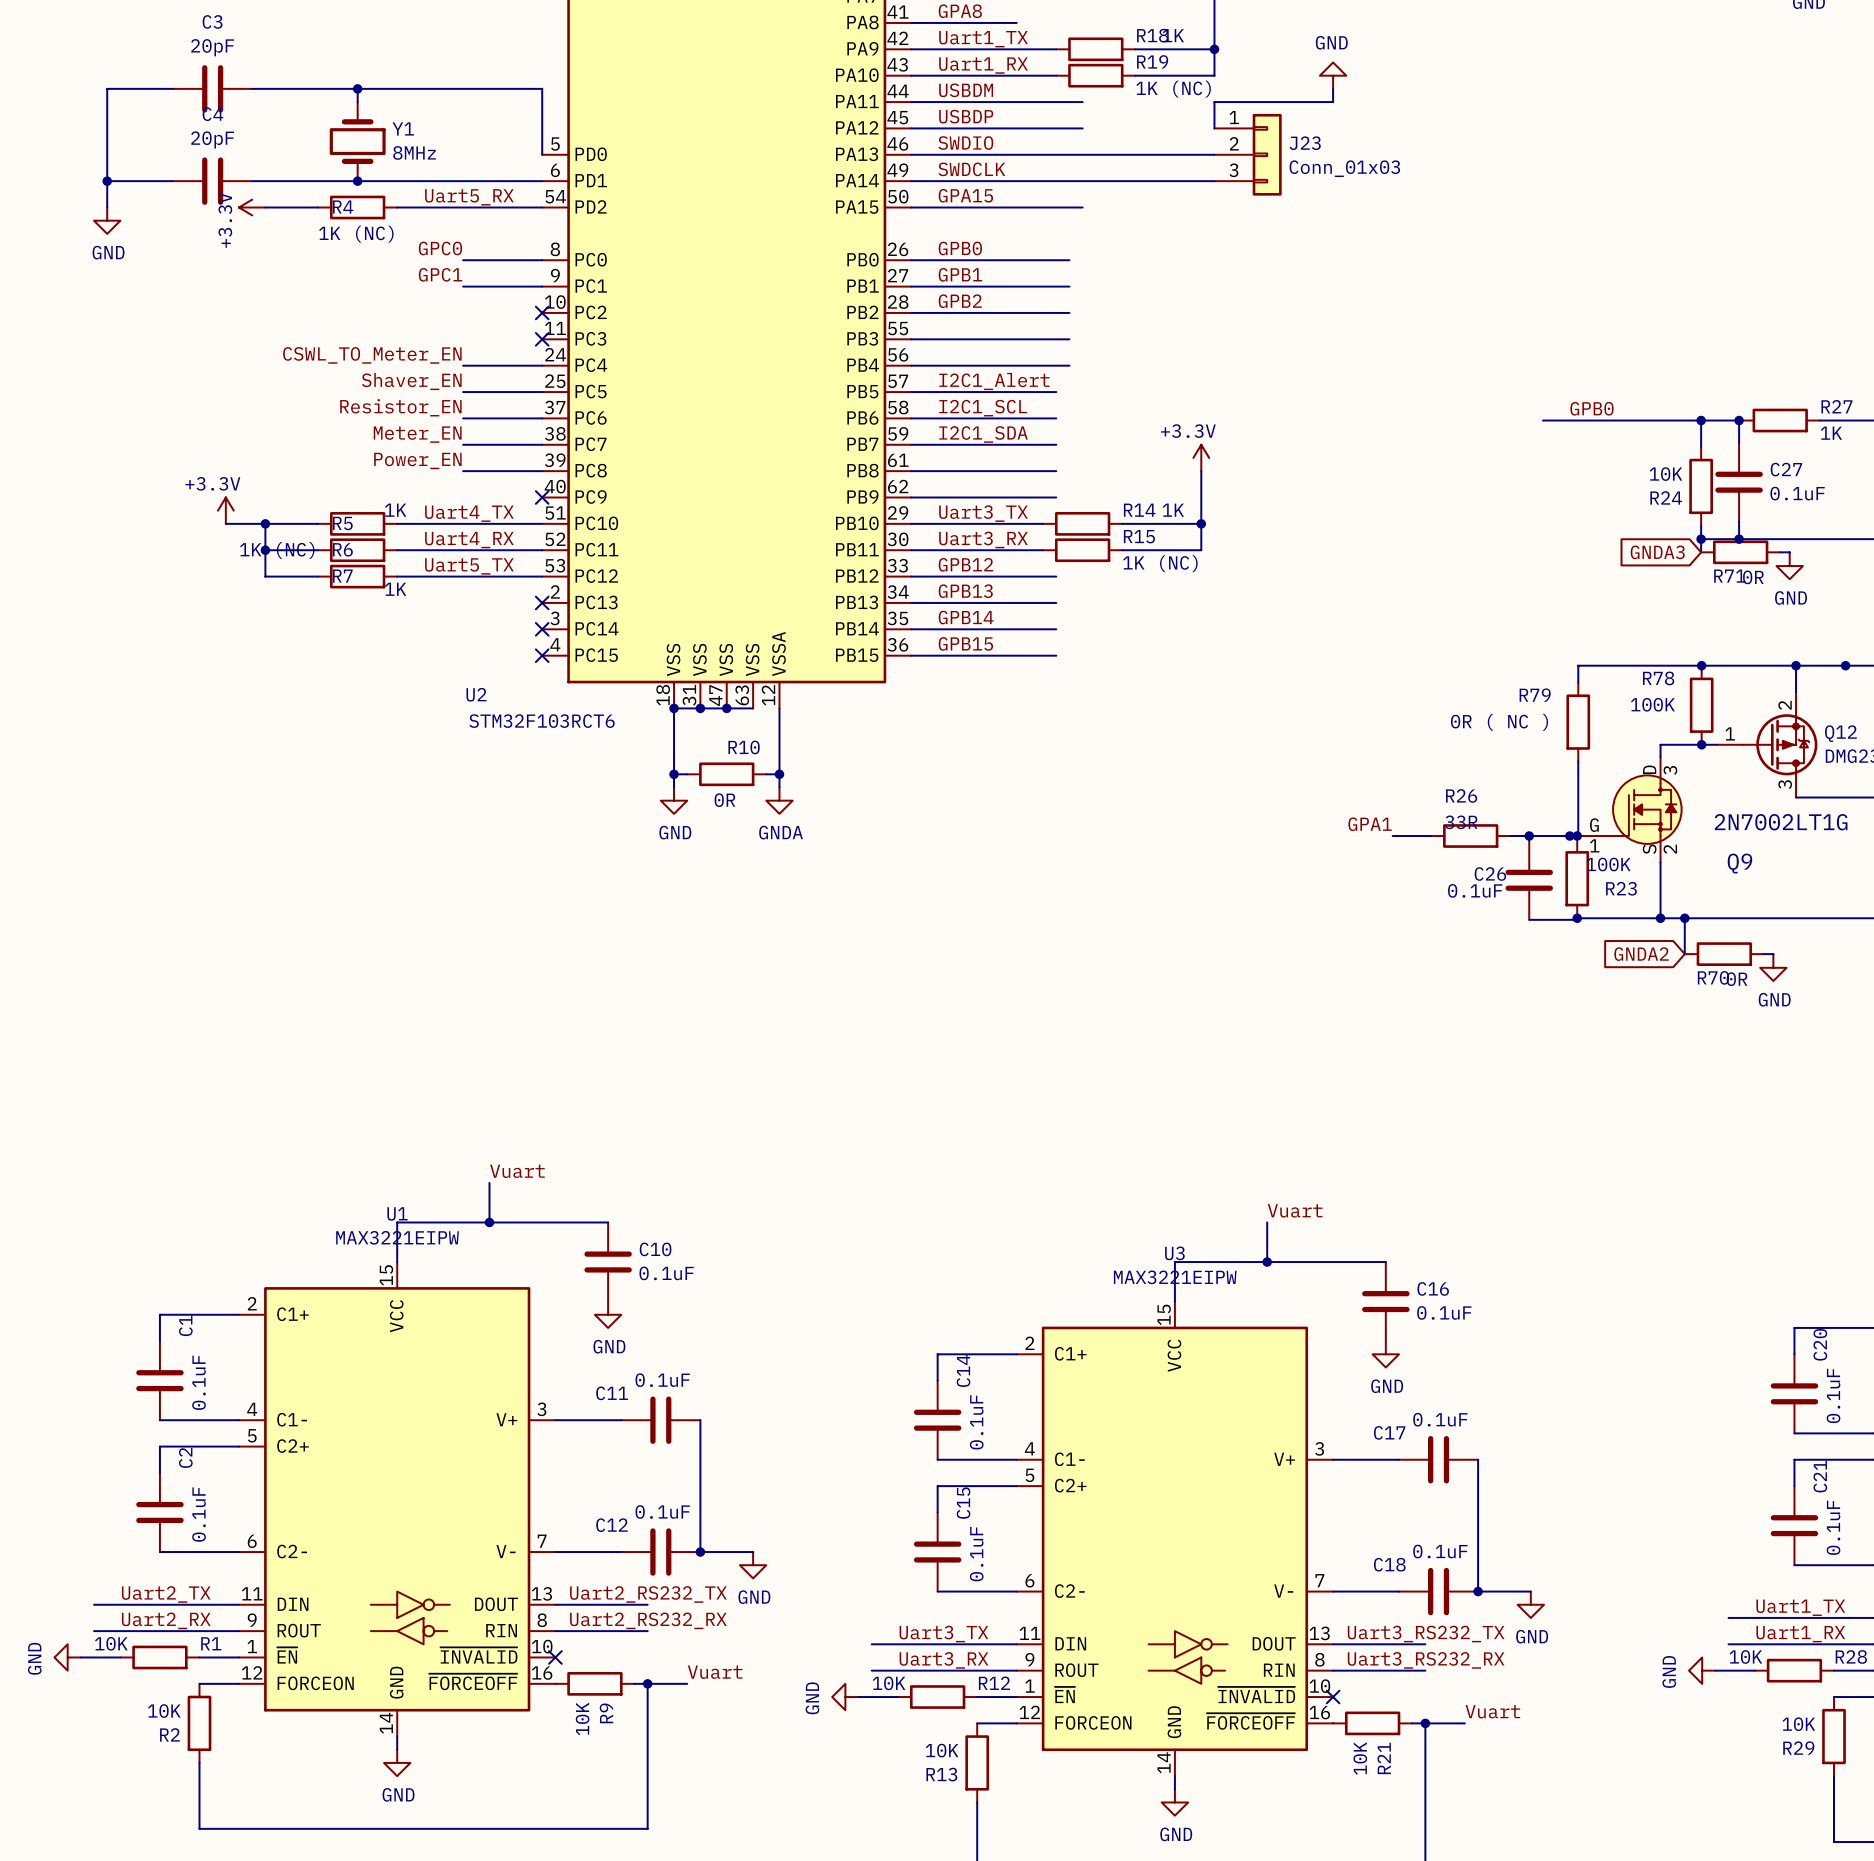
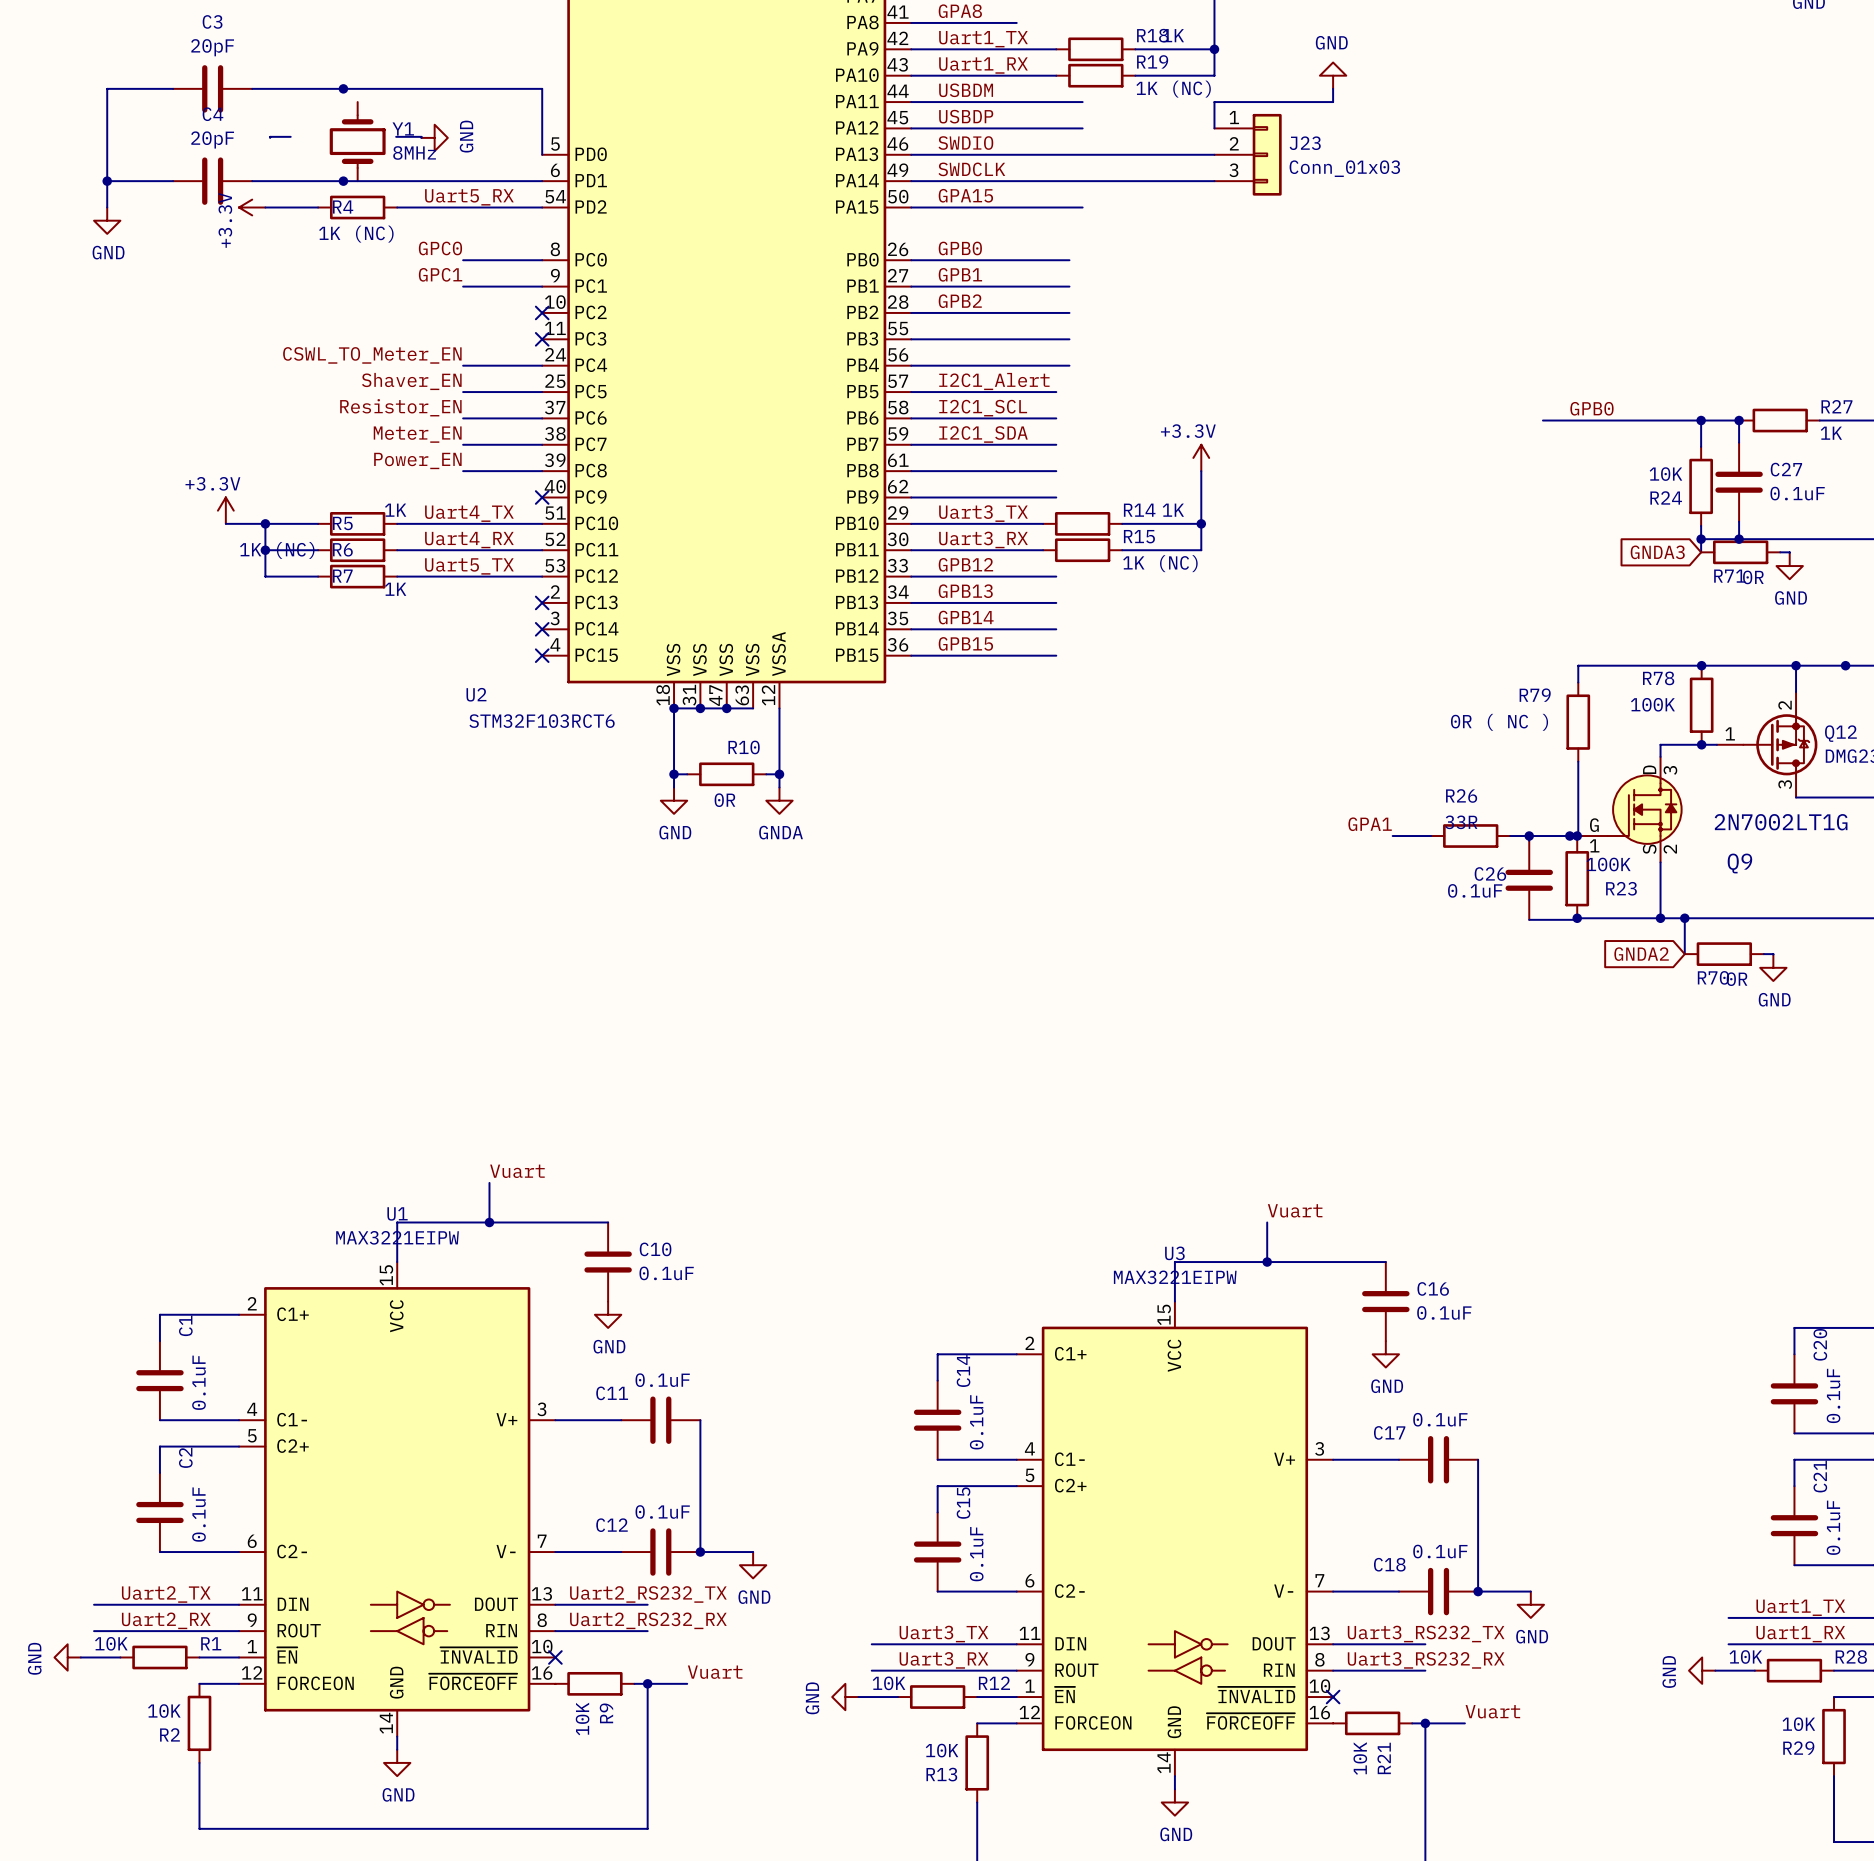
wire: (357, 88) (357, 102) -> none
junction position: (357, 88) -> (343, 88)
wire: none -> (290, 136) (270, 137)
wire: none -> (396, 136) (421, 137)
power symbol: none -> GND (434, 137)
junction position: (357, 181) -> (343, 181)

